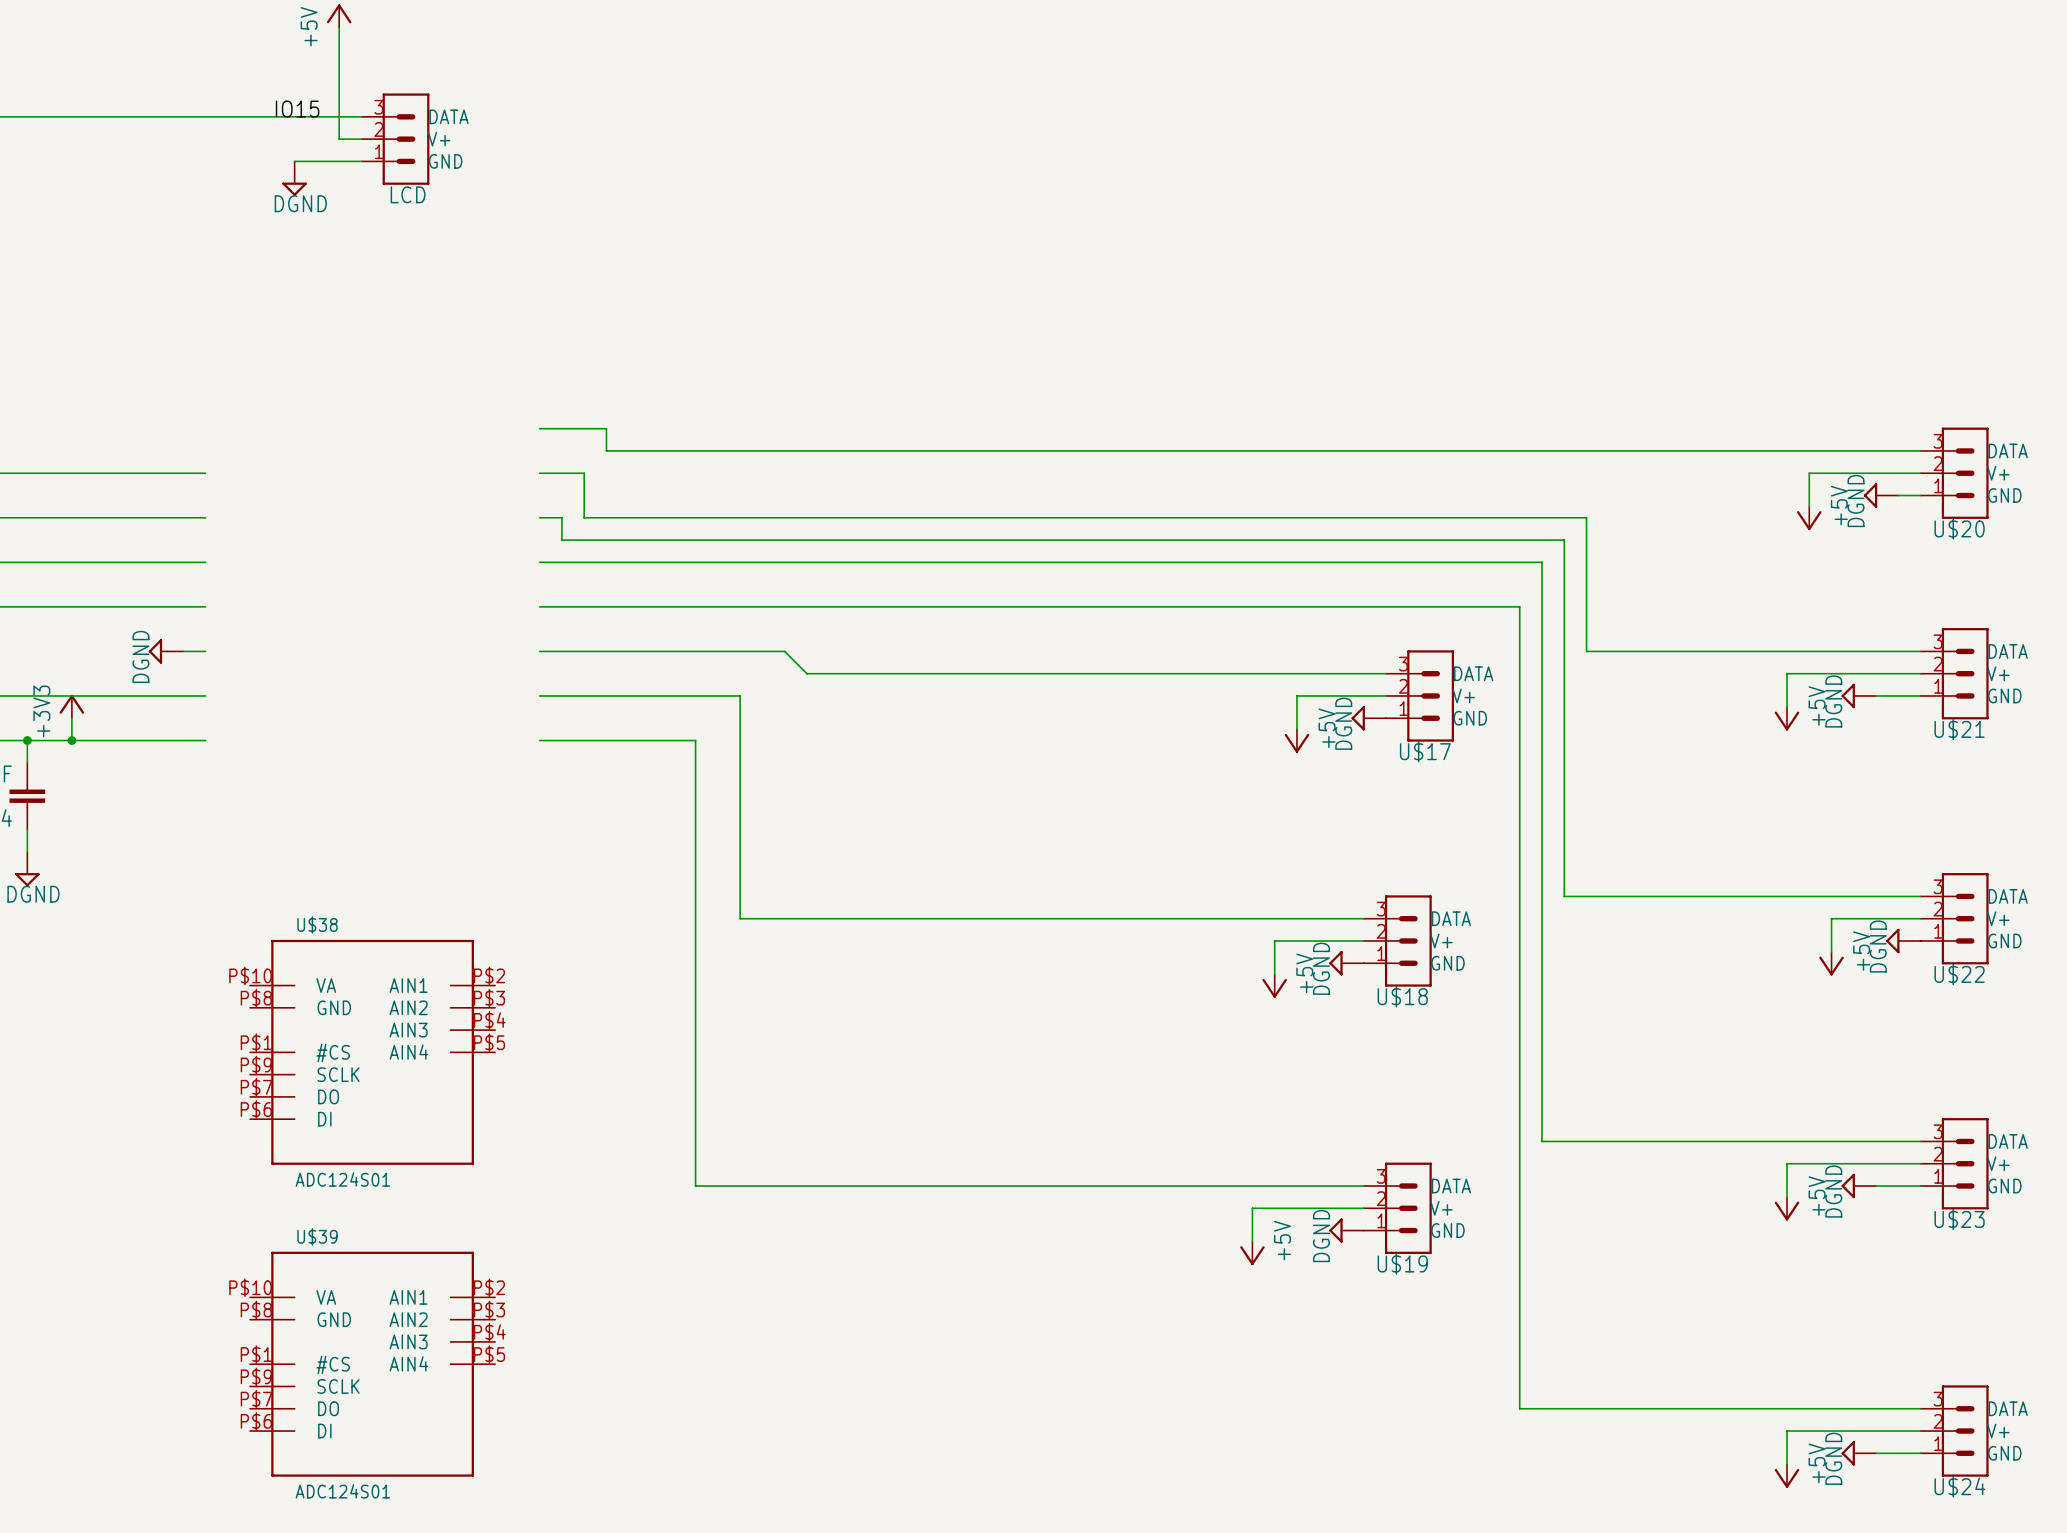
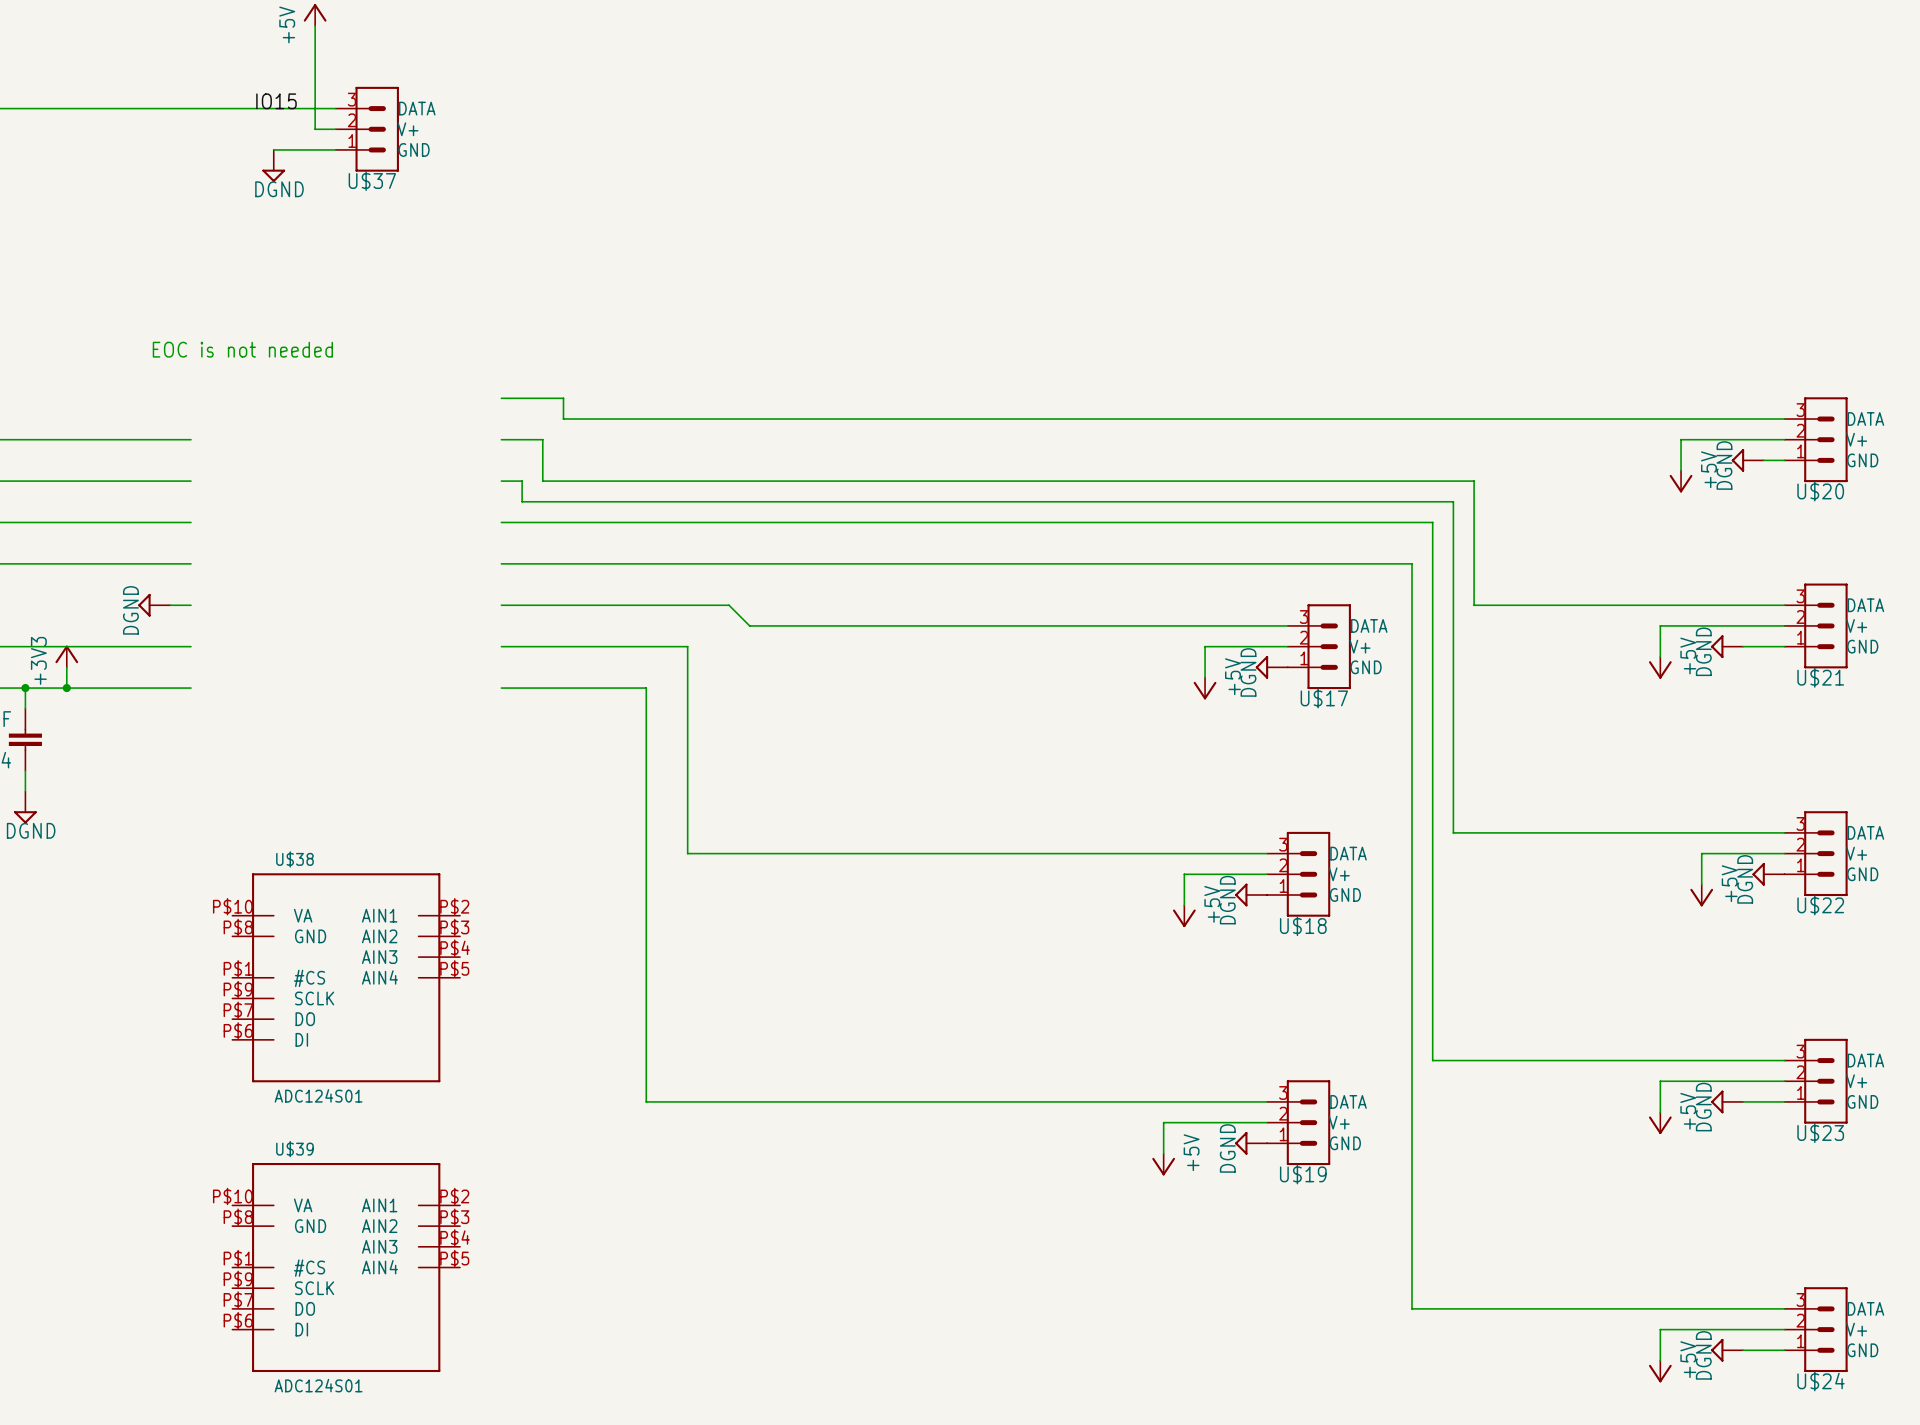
LCD name: LCD (408, 194) -> U$37 (372, 181)
text: none -> EOC is not needed (242, 349)

